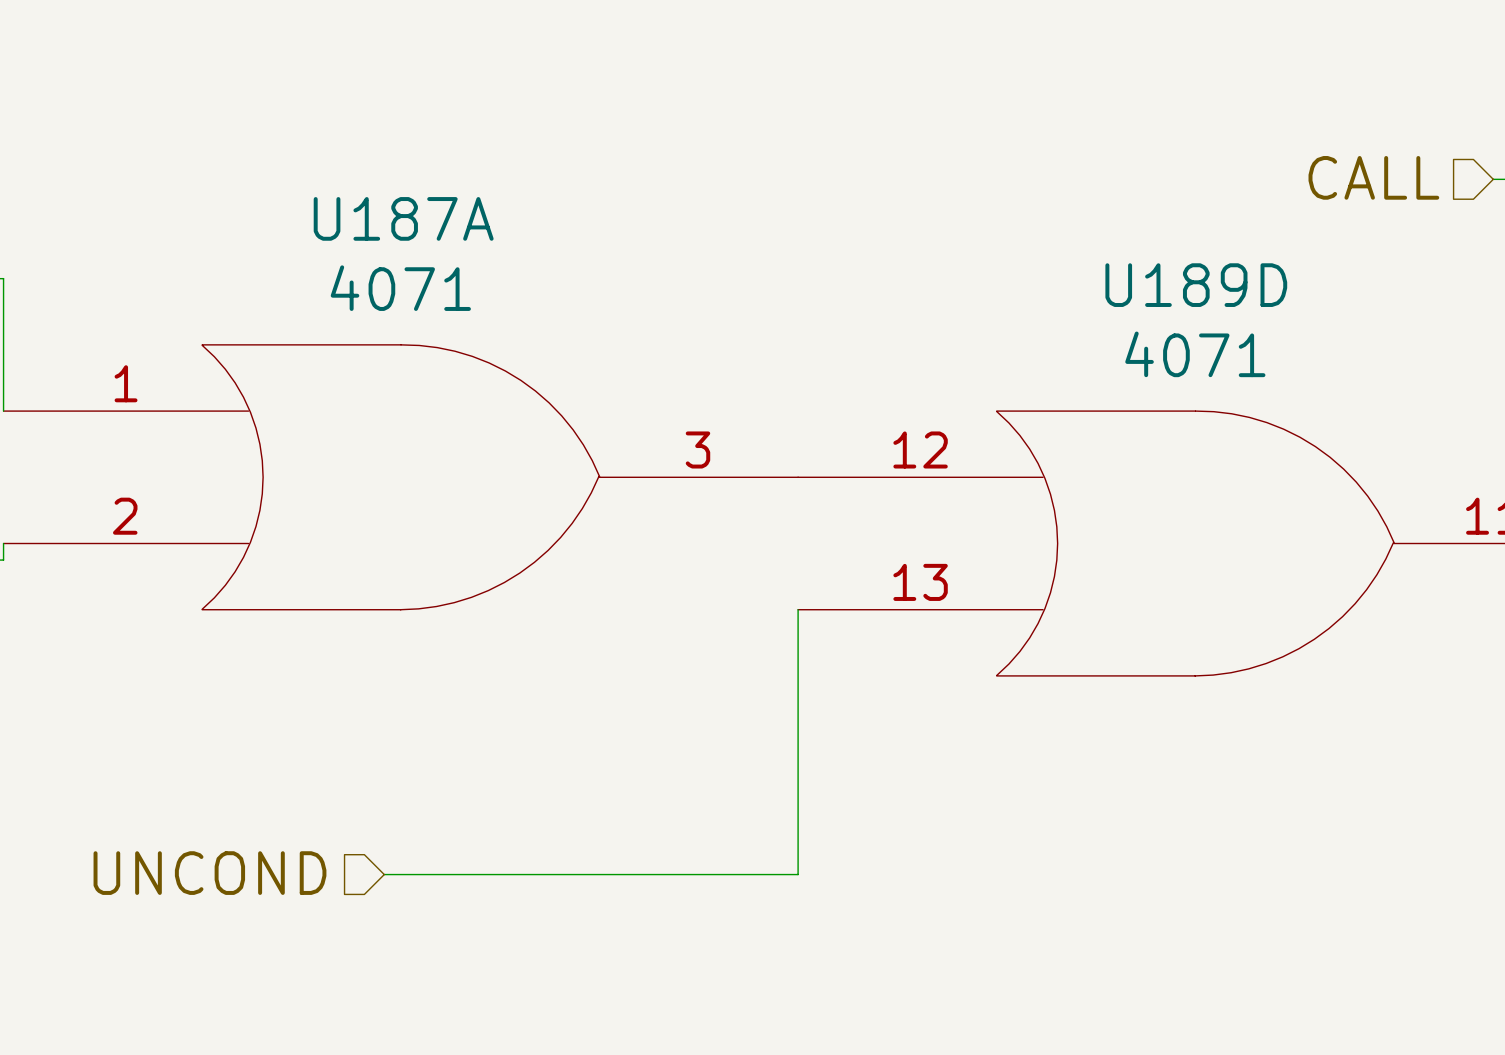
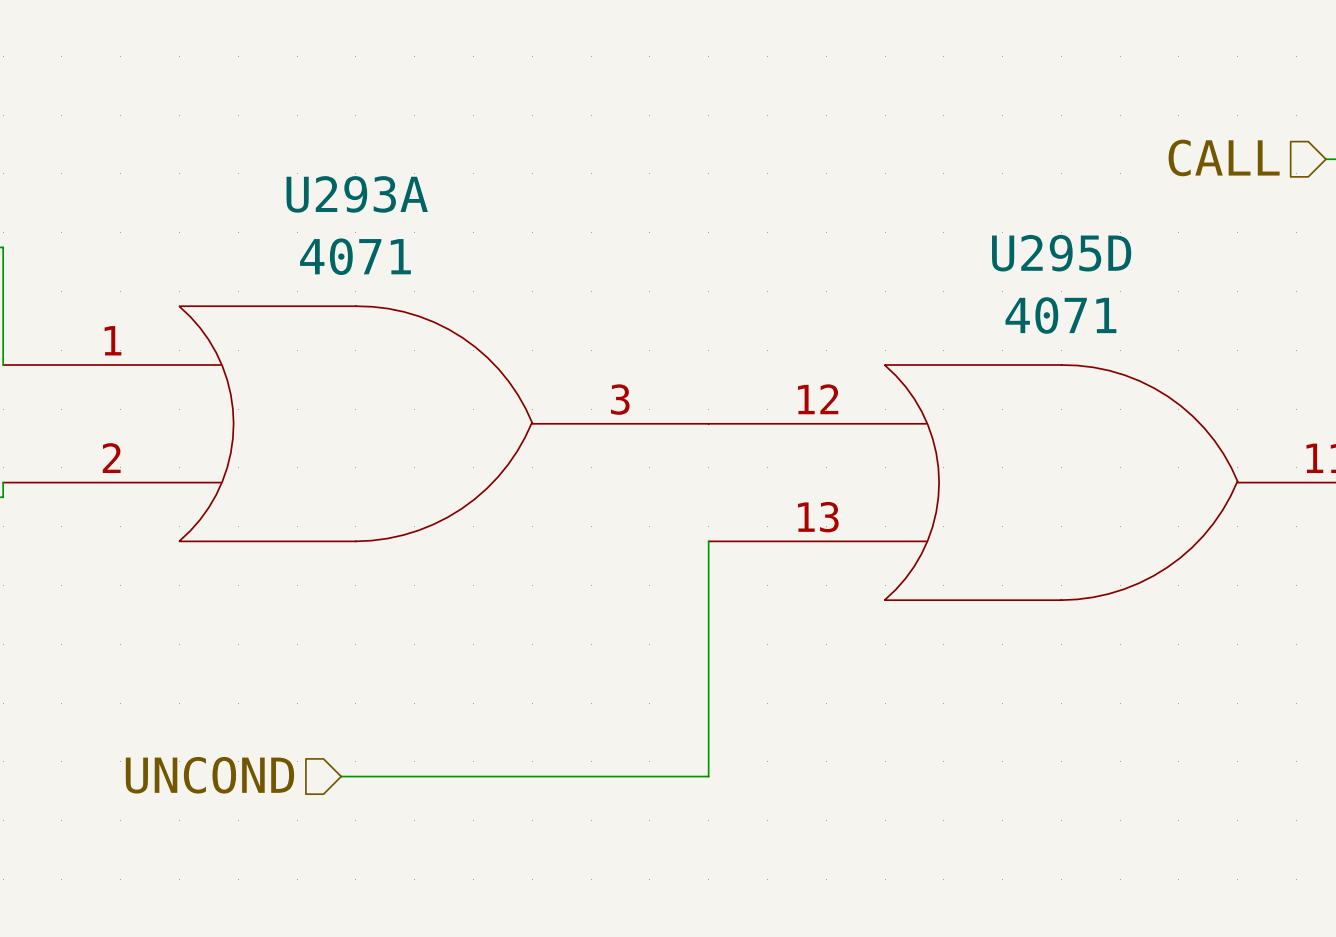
U187A name: U187A (403, 218) -> U293A (357, 194)
U189D name: U189D (1196, 285) -> U295D (1061, 253)

